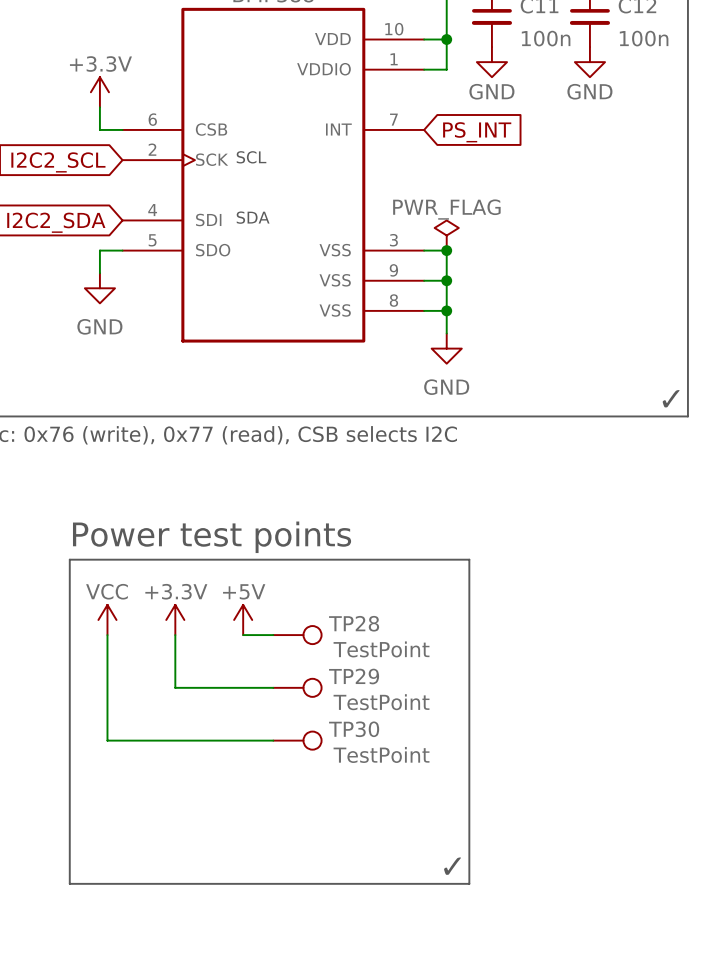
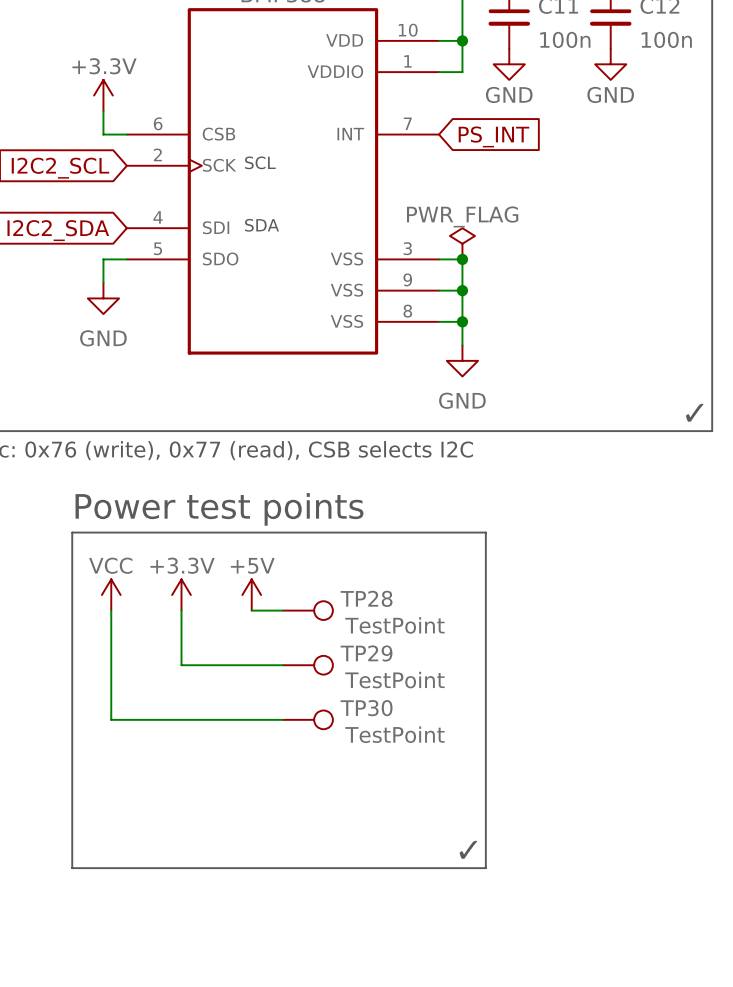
text position: Power test points (212, 537) -> Power test points (219, 509)
line: (69, 559) (469, 559) -> (72, 579) (72, 532) (485, 532) (485, 579)
power symbol position: VCC (107, 620) -> VCC (111, 594)
power symbol position: +3.3V (175, 620) -> +3.3V (181, 594)
power symbol position: +5V (243, 620) -> +5V (251, 594)
wire: (243, 635) (273, 635) -> (251, 610) (282, 610)
TP28 position: (297, 635) -> (307, 610)
wire: (175, 642) (175, 687) (273, 687) -> (181, 665) (282, 665)
TP29 position: (297, 687) -> (307, 665)
wire: (107, 695) (107, 740) (273, 740) -> (111, 719) (282, 719)
TP30 position: (297, 740) -> (307, 719)
line: (69, 838) (69, 883) (469, 883) (469, 838) -> (72, 868) (485, 868)
text position: ✓ (452, 866) -> ✓ (468, 849)

